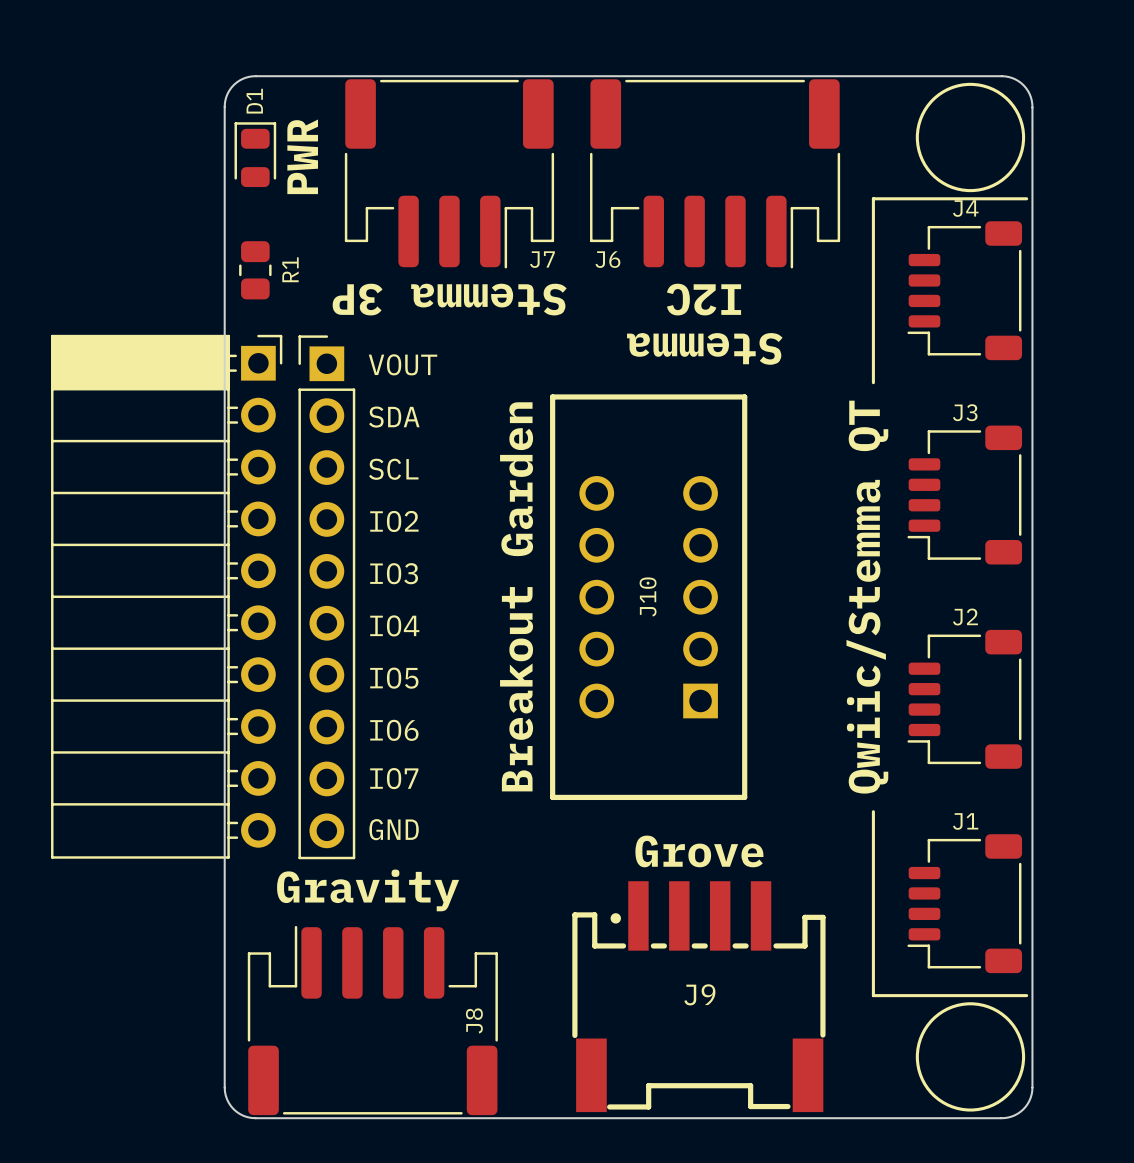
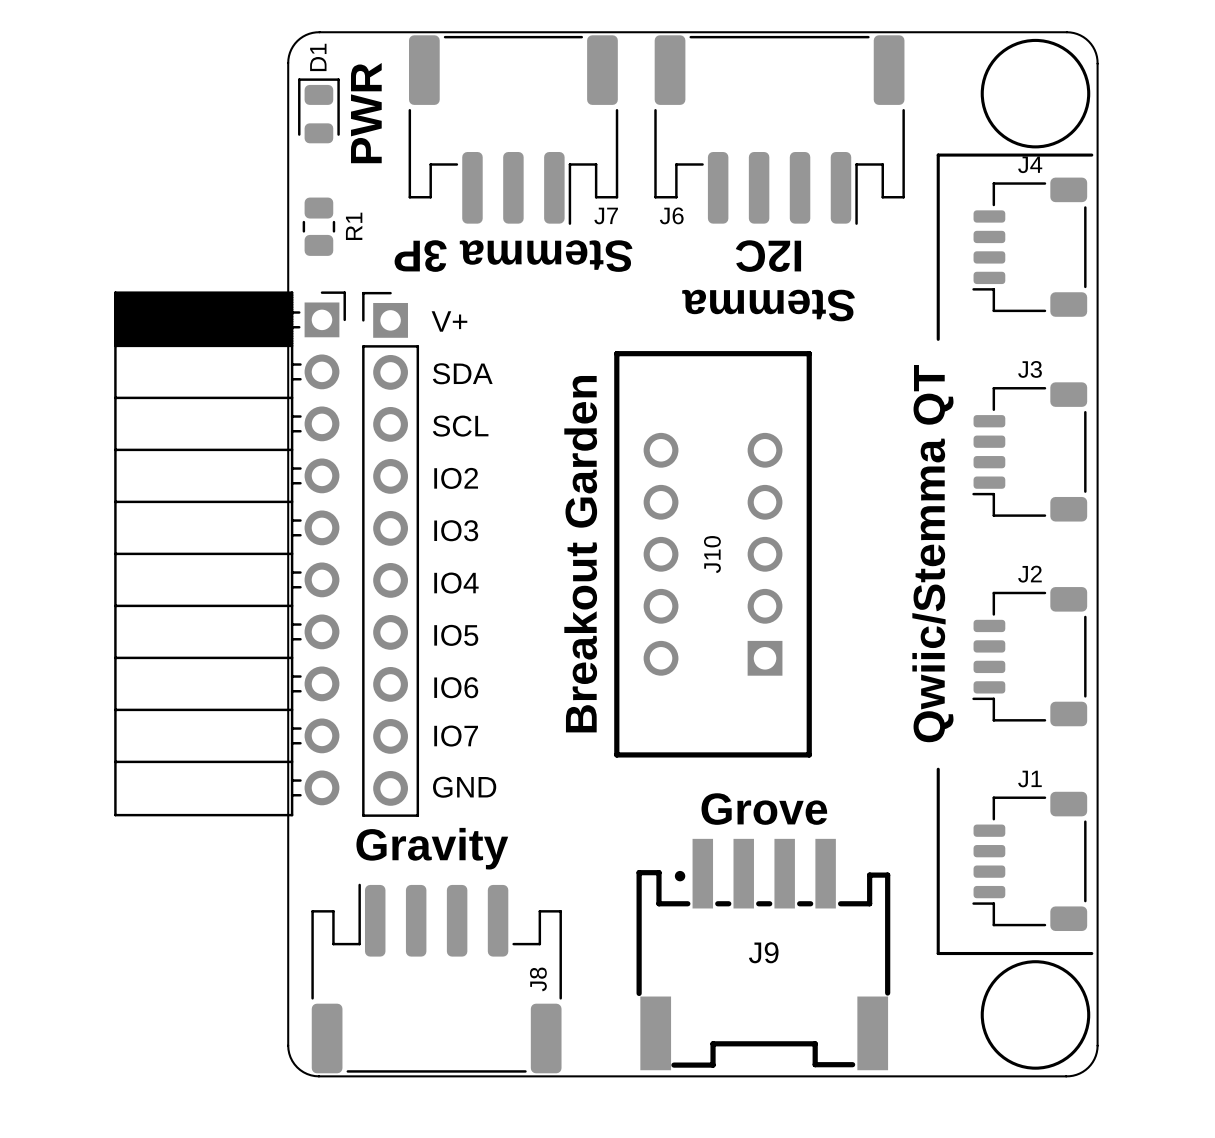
text: VOUT (403, 364) -> V+ (449, 321)

